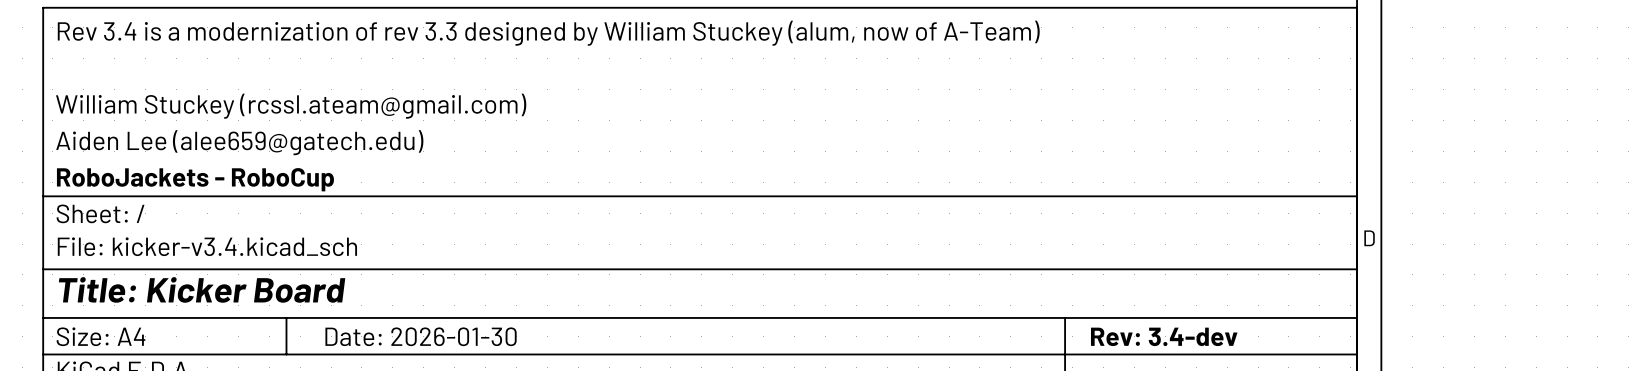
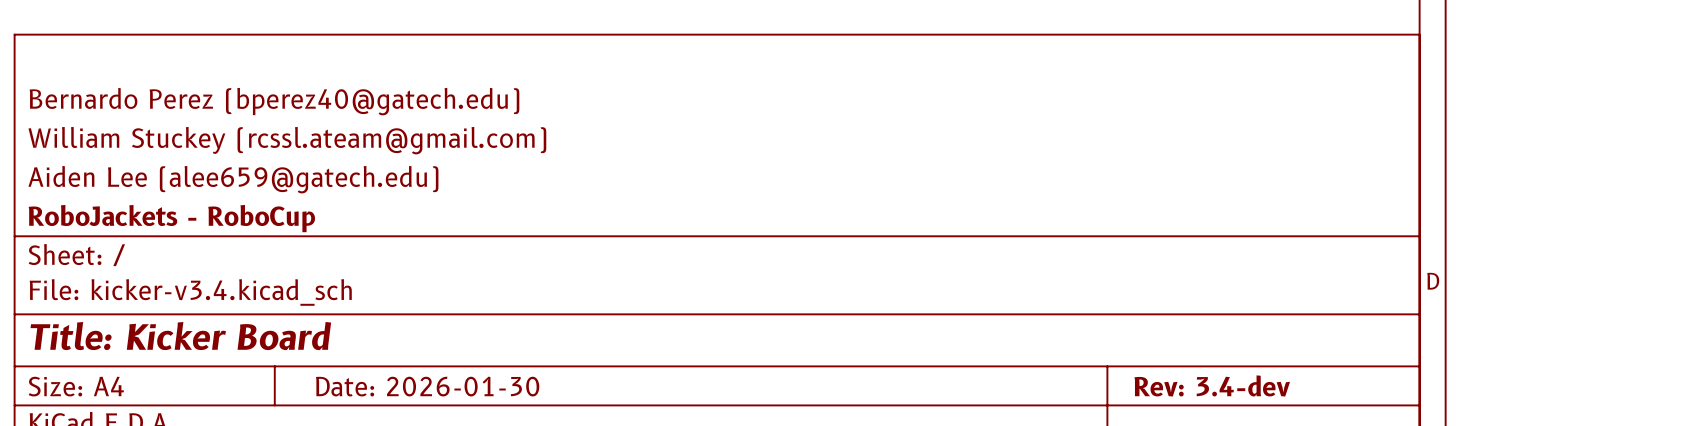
title block: Rev 3.4 is a modernization of rev 3.3 designed by William Stuckey (alum, now of A-Team) (548, 33) -> none
title block: none -> Bernardo Perez (bperez40@gatech.edu) (274, 101)

